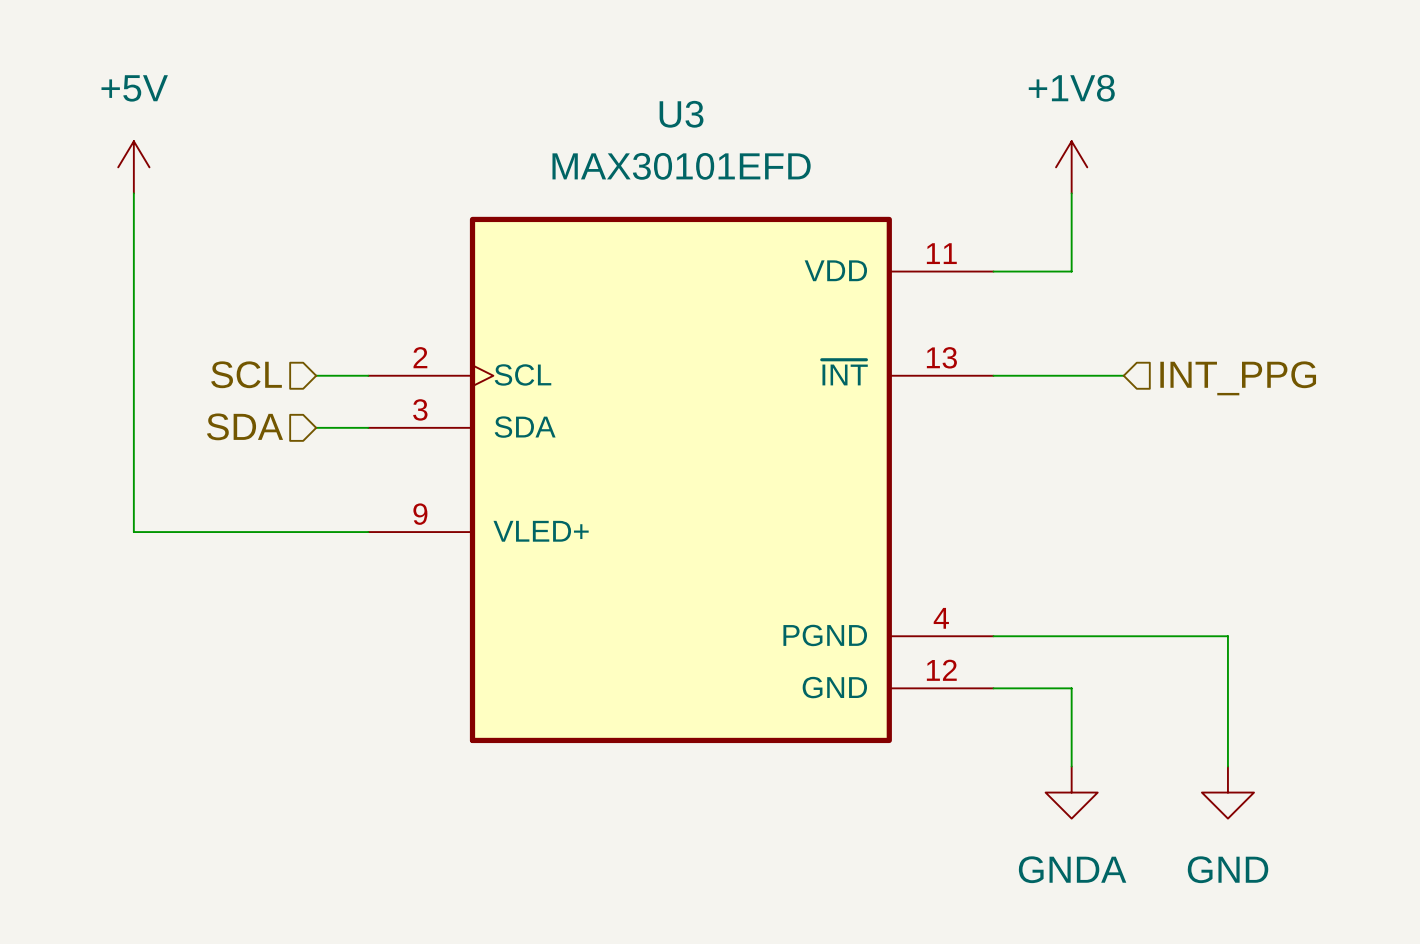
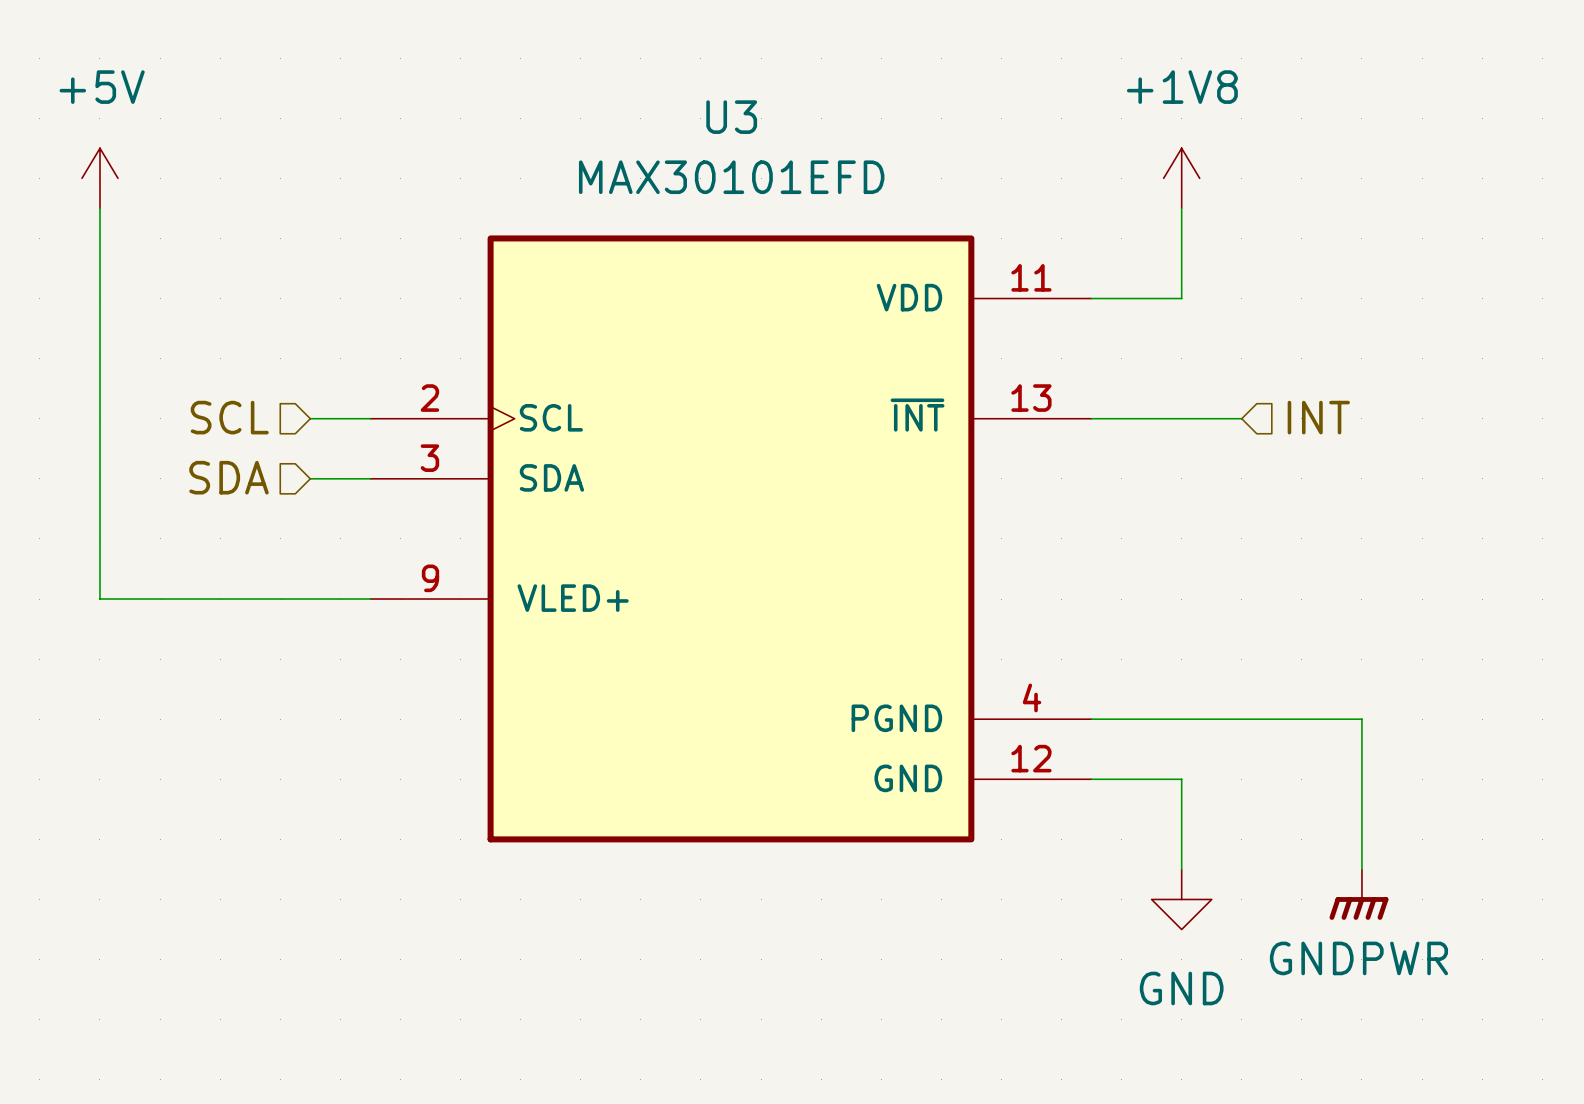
hierarchical label: INT_PPG (1238, 378) -> INT (1318, 417)
power symbol: GNDA (1071, 792) -> GND (1181, 899)
power symbol: GND (1227, 792) -> GNDPWR (1358, 894)

